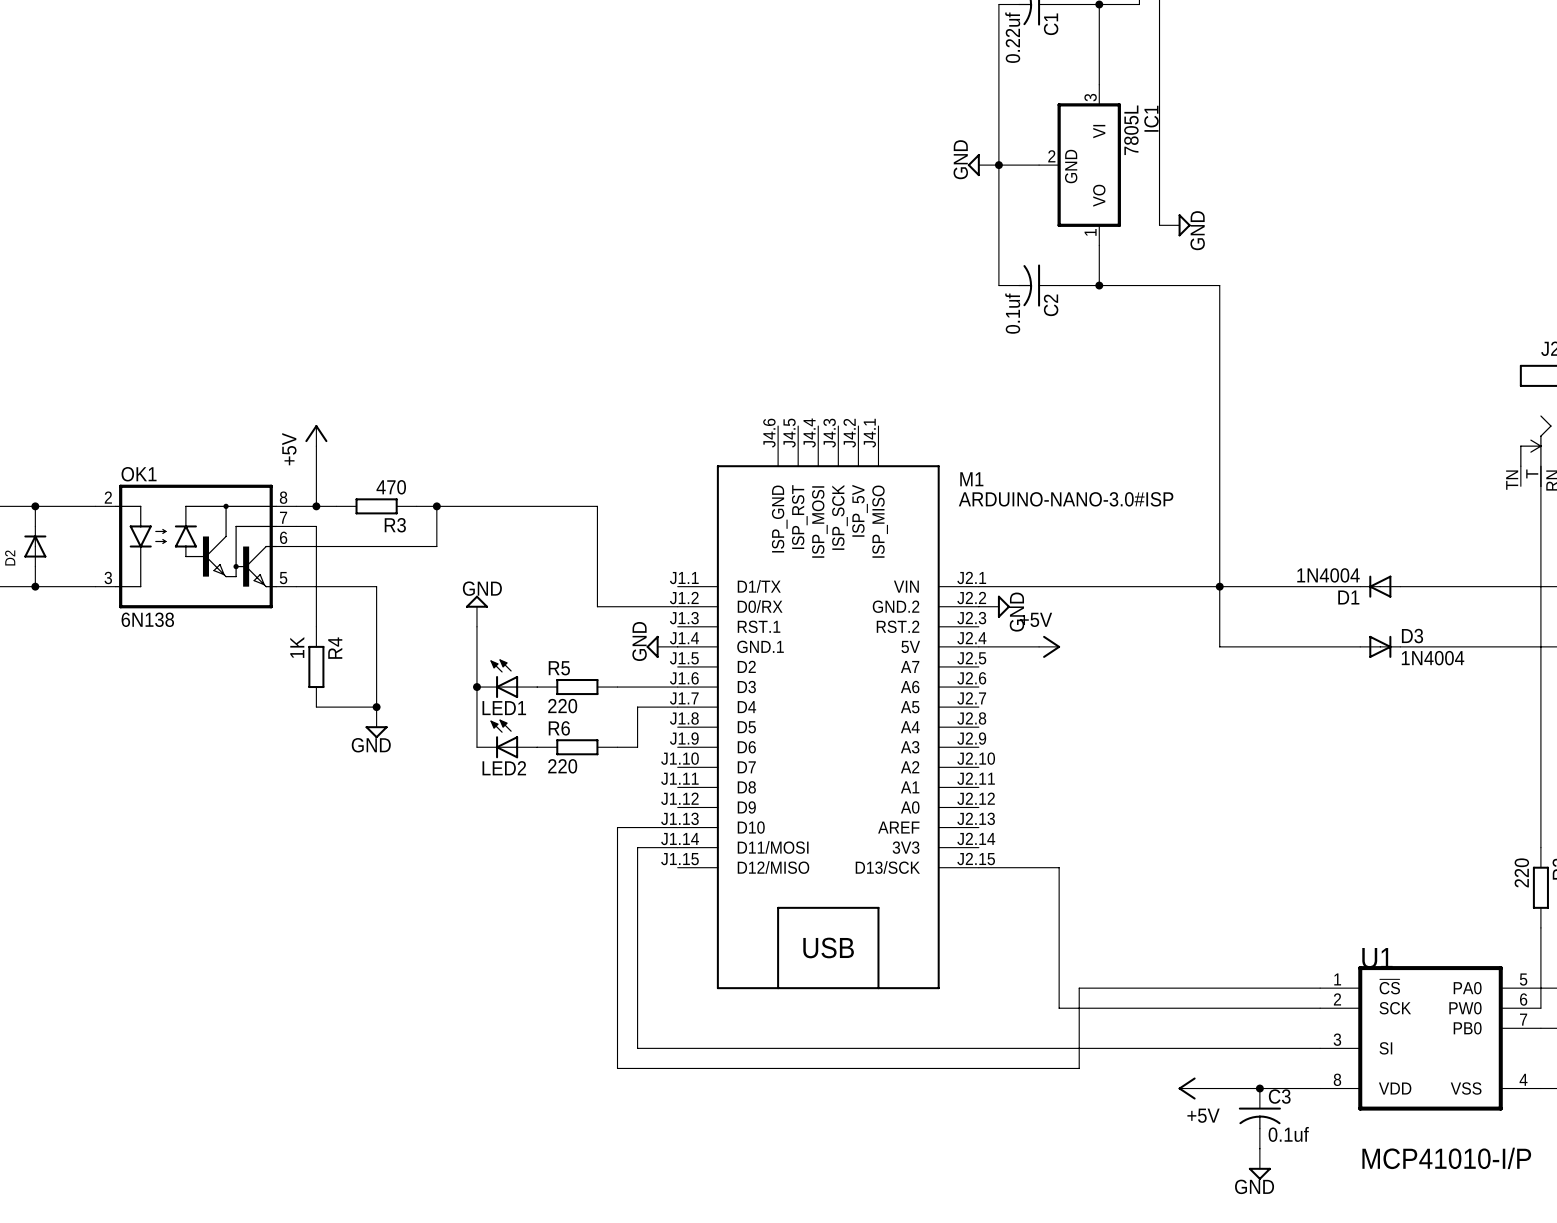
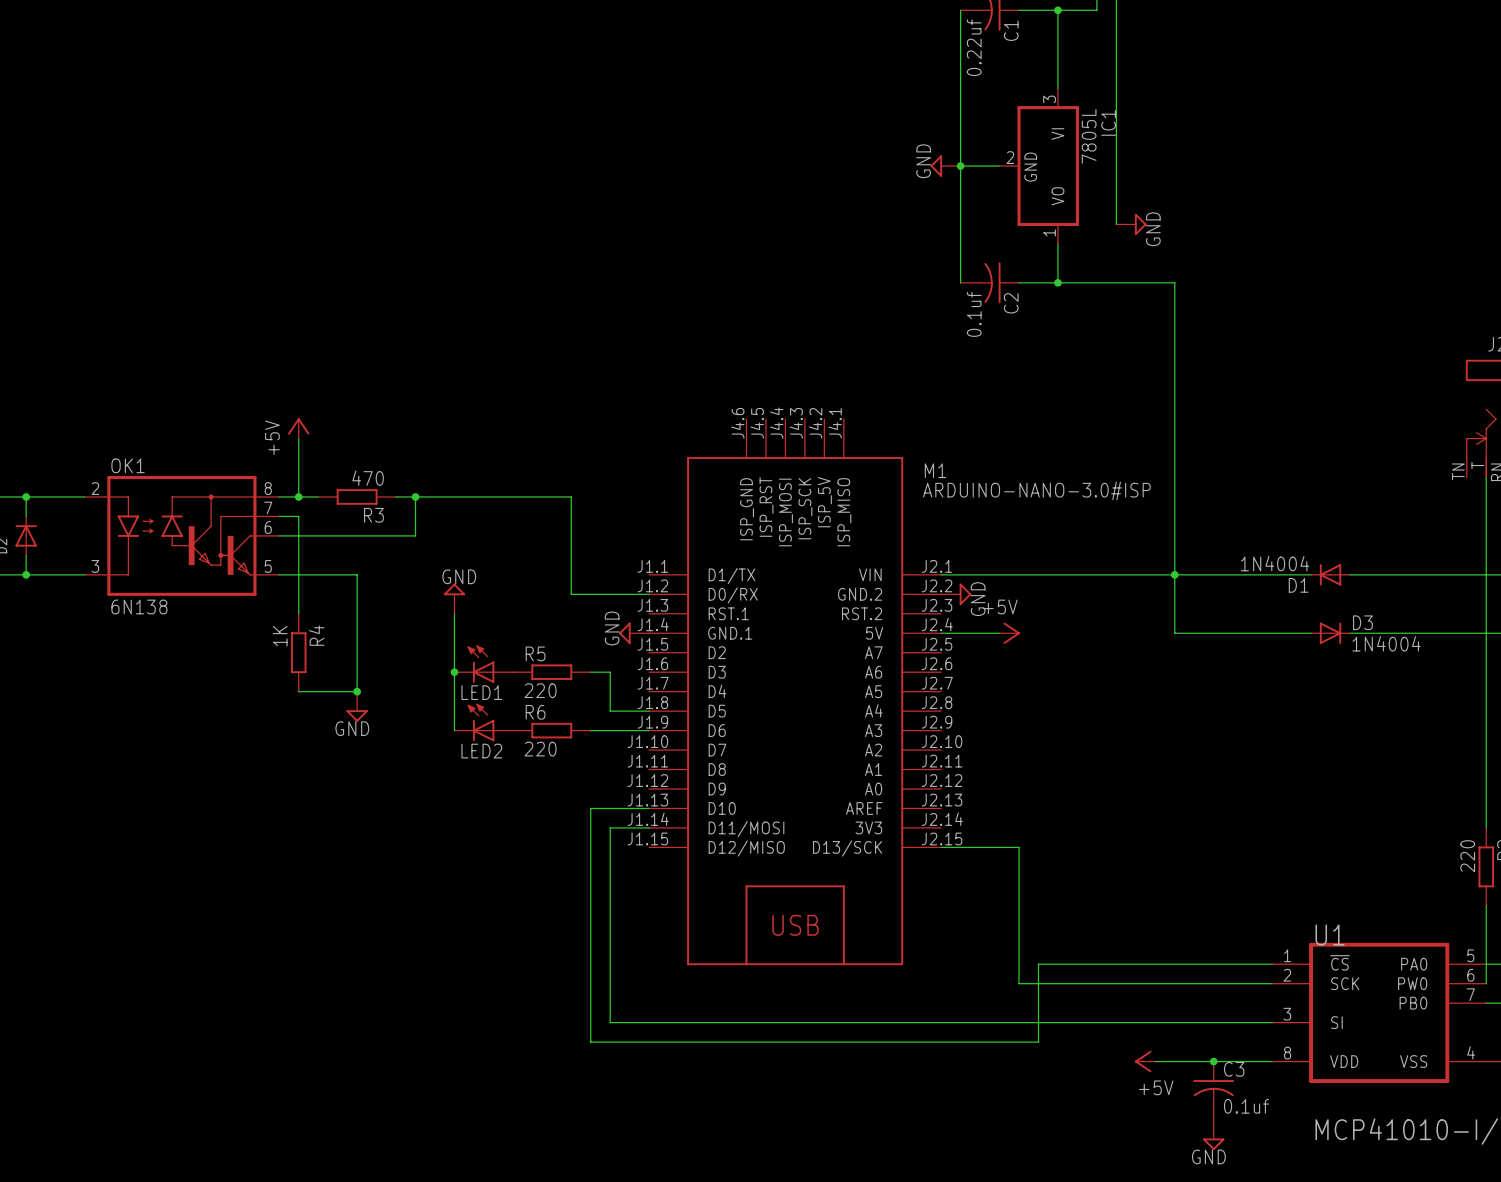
wire: (637, 687) (677, 687) -> (610, 672) (610, 691)
wire: (637, 707) (677, 707) -> (610, 730) (649, 730)
wire: (637, 727) (637, 747) -> (610, 711) (649, 711)

